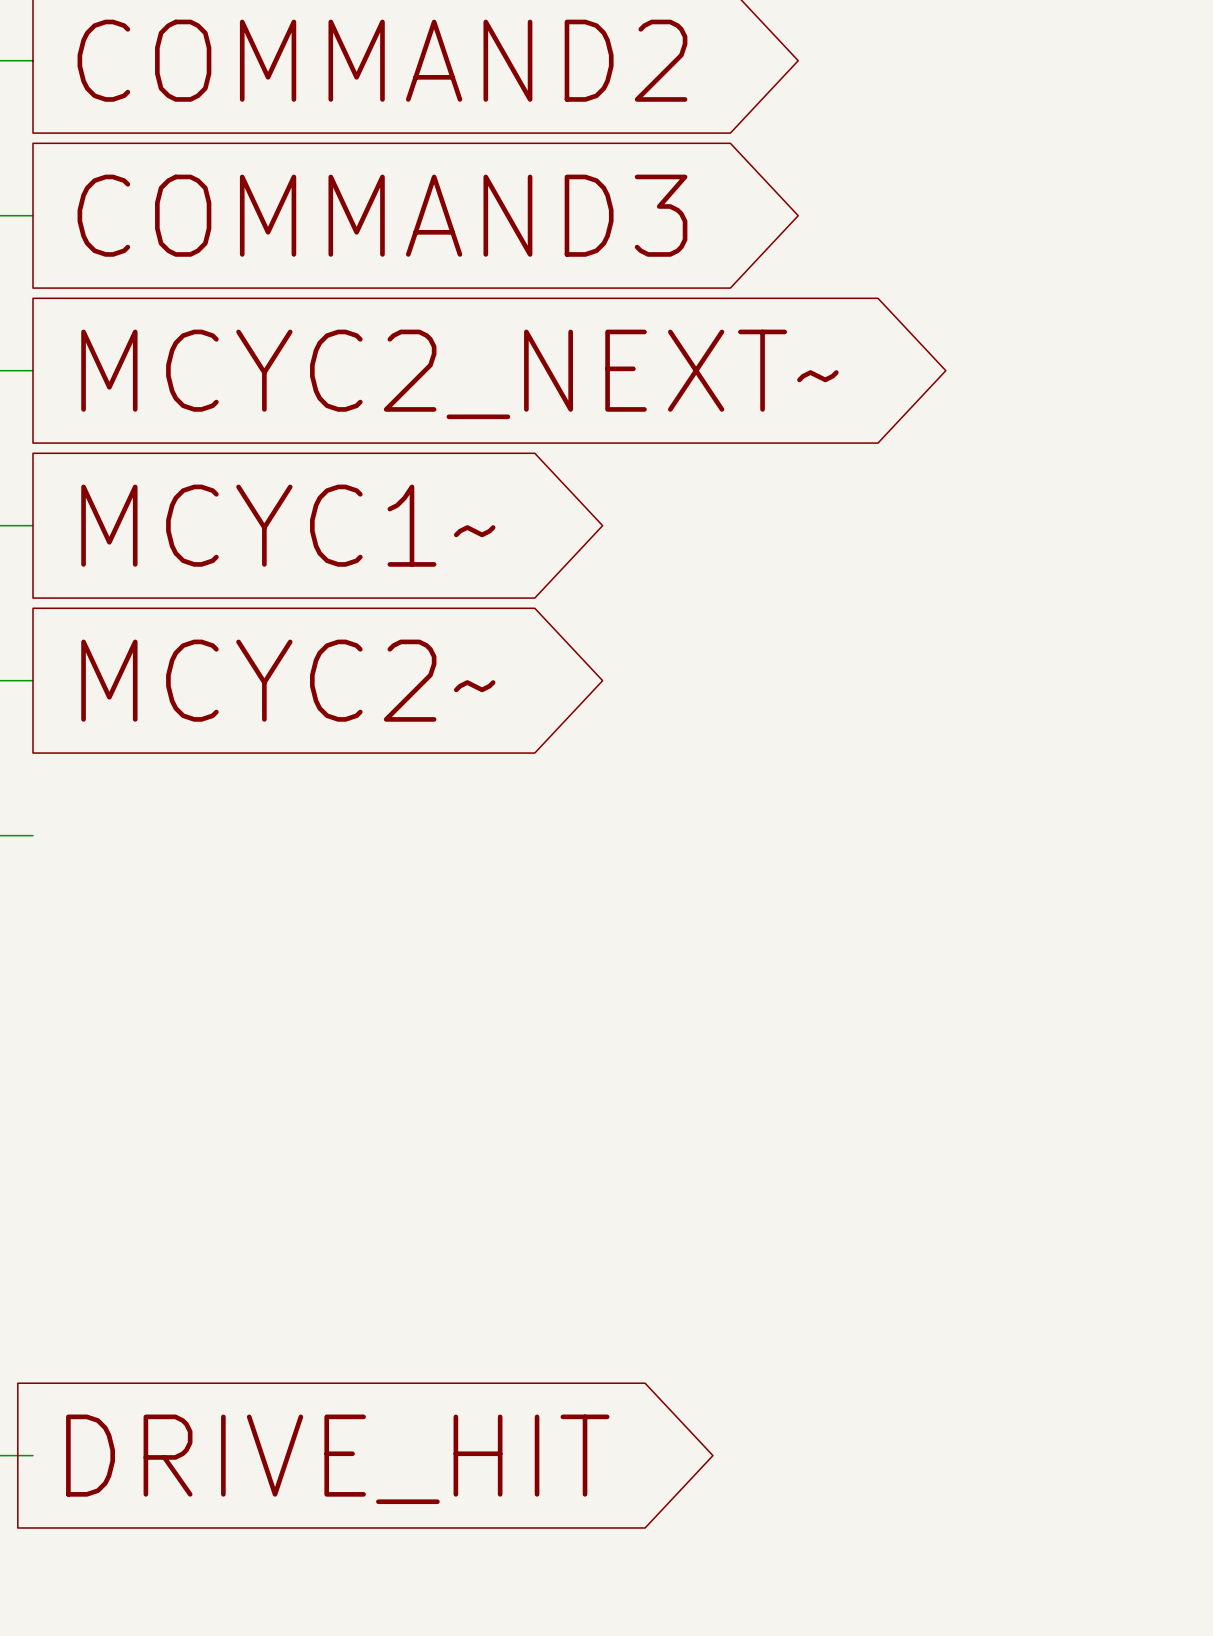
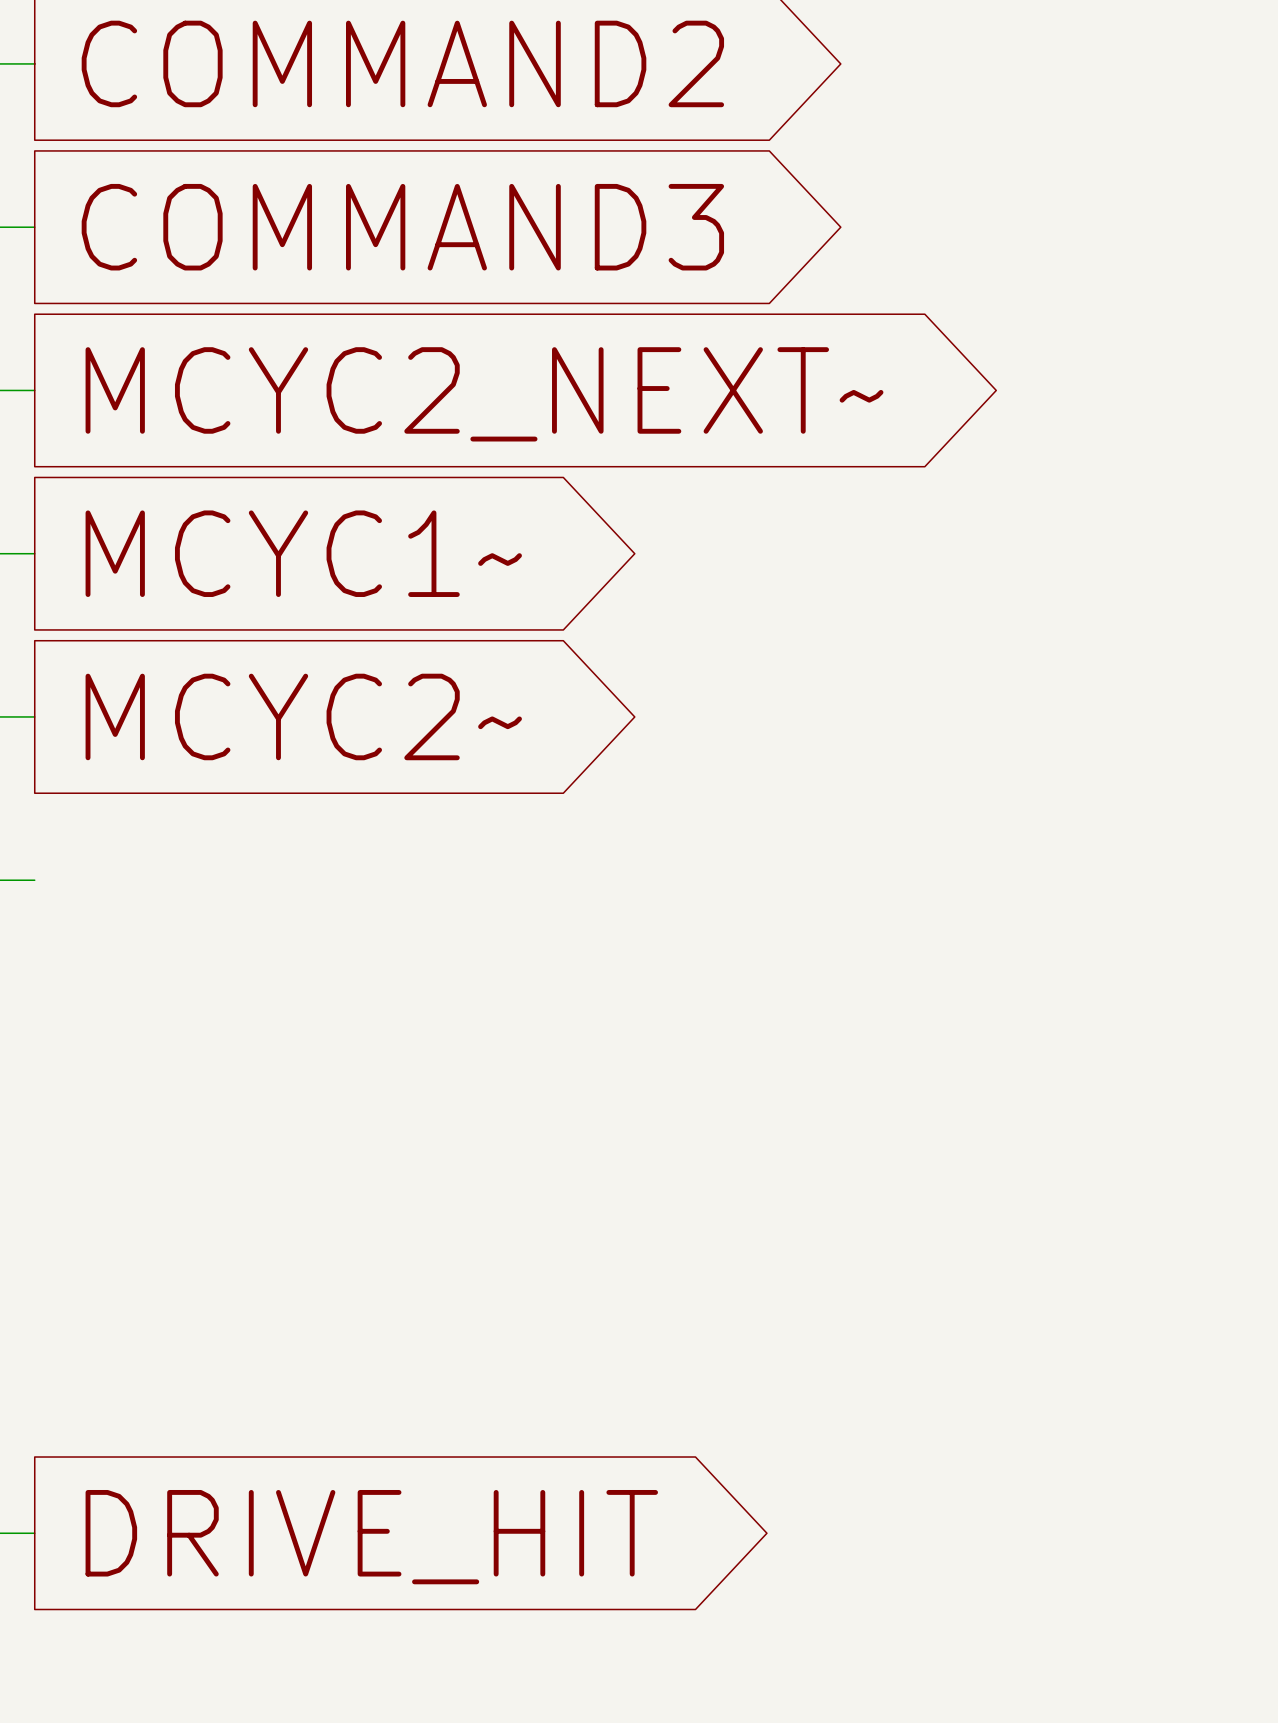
global label position: DRIVE_HIT (337, 1459) -> DRIVE_HIT (371, 1537)

